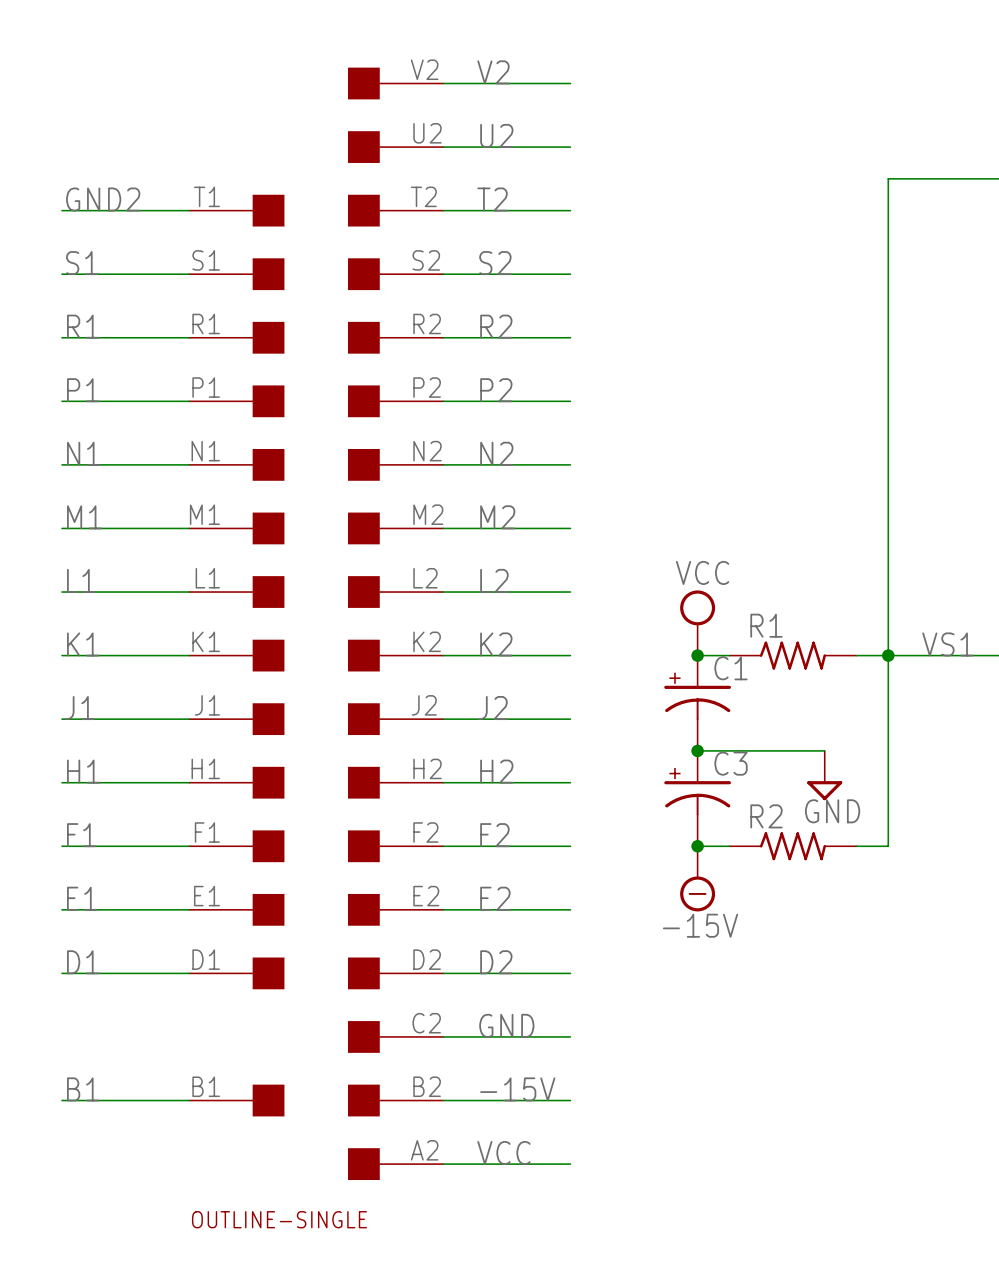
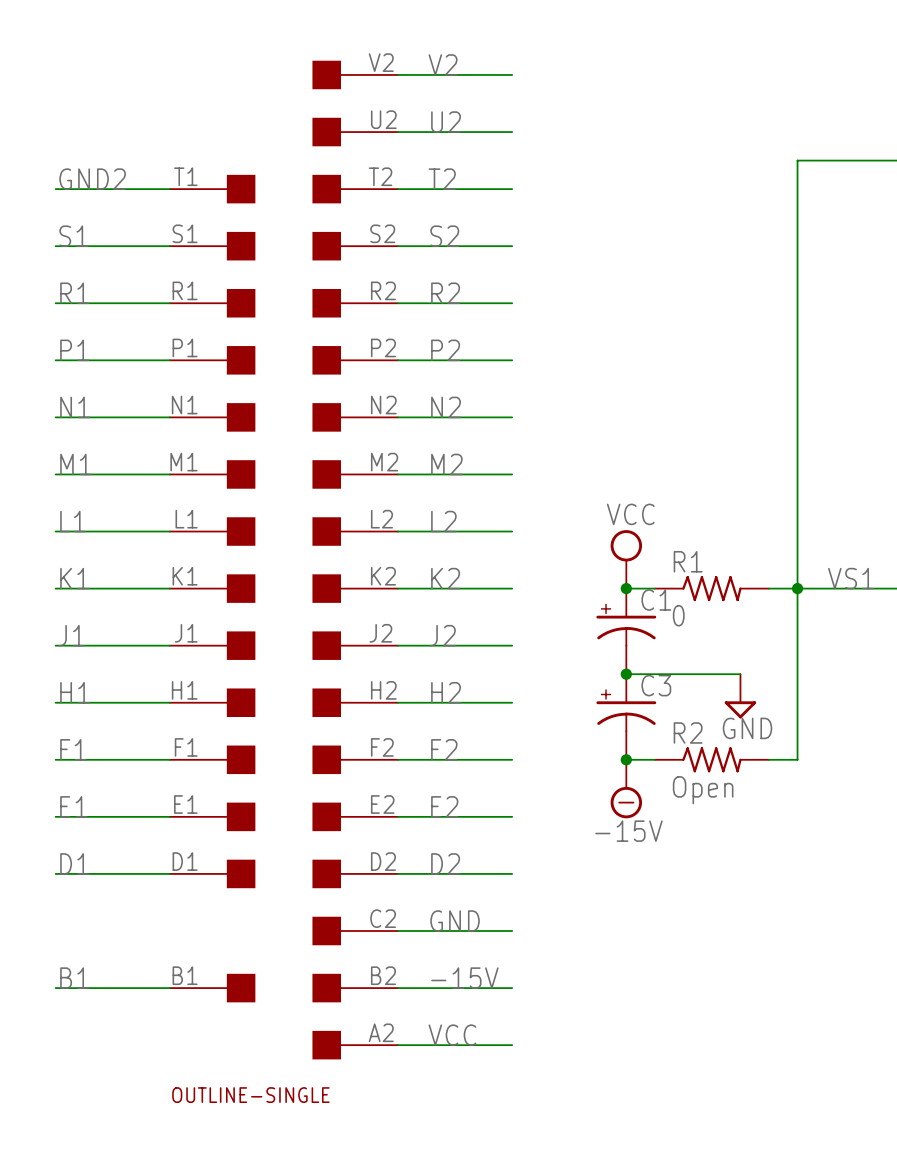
R1 value: none -> 0 (678, 615)
R2 value: none -> Open (703, 790)

